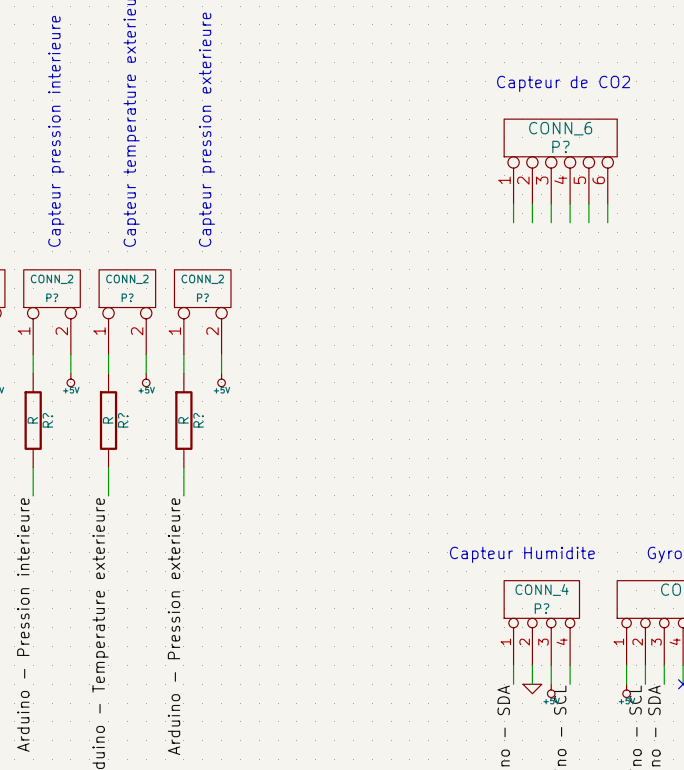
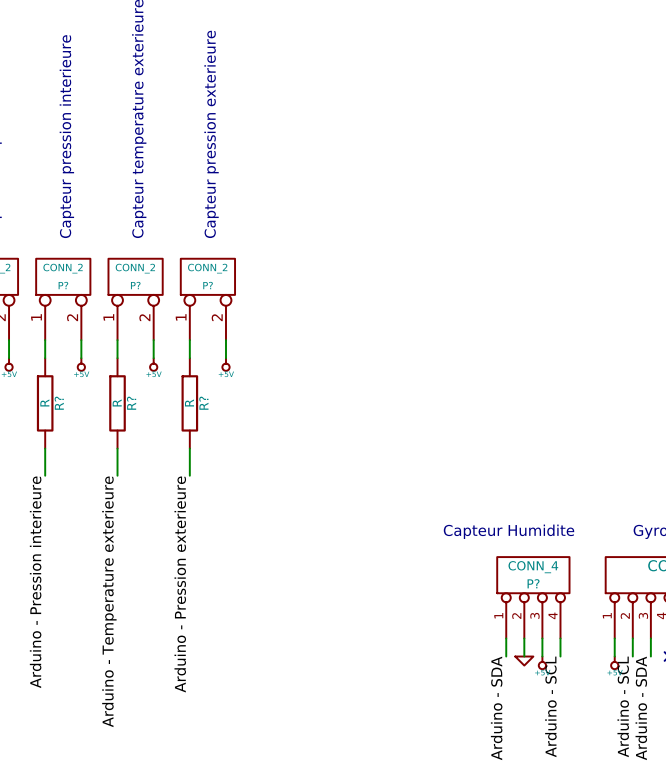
text: Capteur de CO2 (563, 83) -> none
P?: CONN_6 (560, 161) -> none
wire: (513, 203) (513, 222) -> none
wire: (532, 203) (532, 222) -> none
wire: (551, 203) (551, 222) -> none
wire: (570, 203) (570, 222) -> none
wire: (588, 203) (588, 222) -> none
wire: (607, 203) (607, 222) -> none

